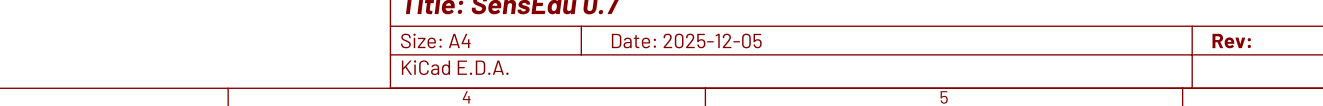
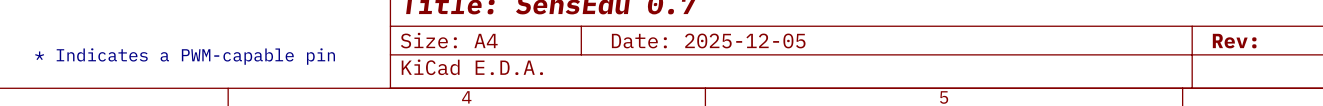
text: none -> * Indicates a PWM-capable pin (185, 56)

